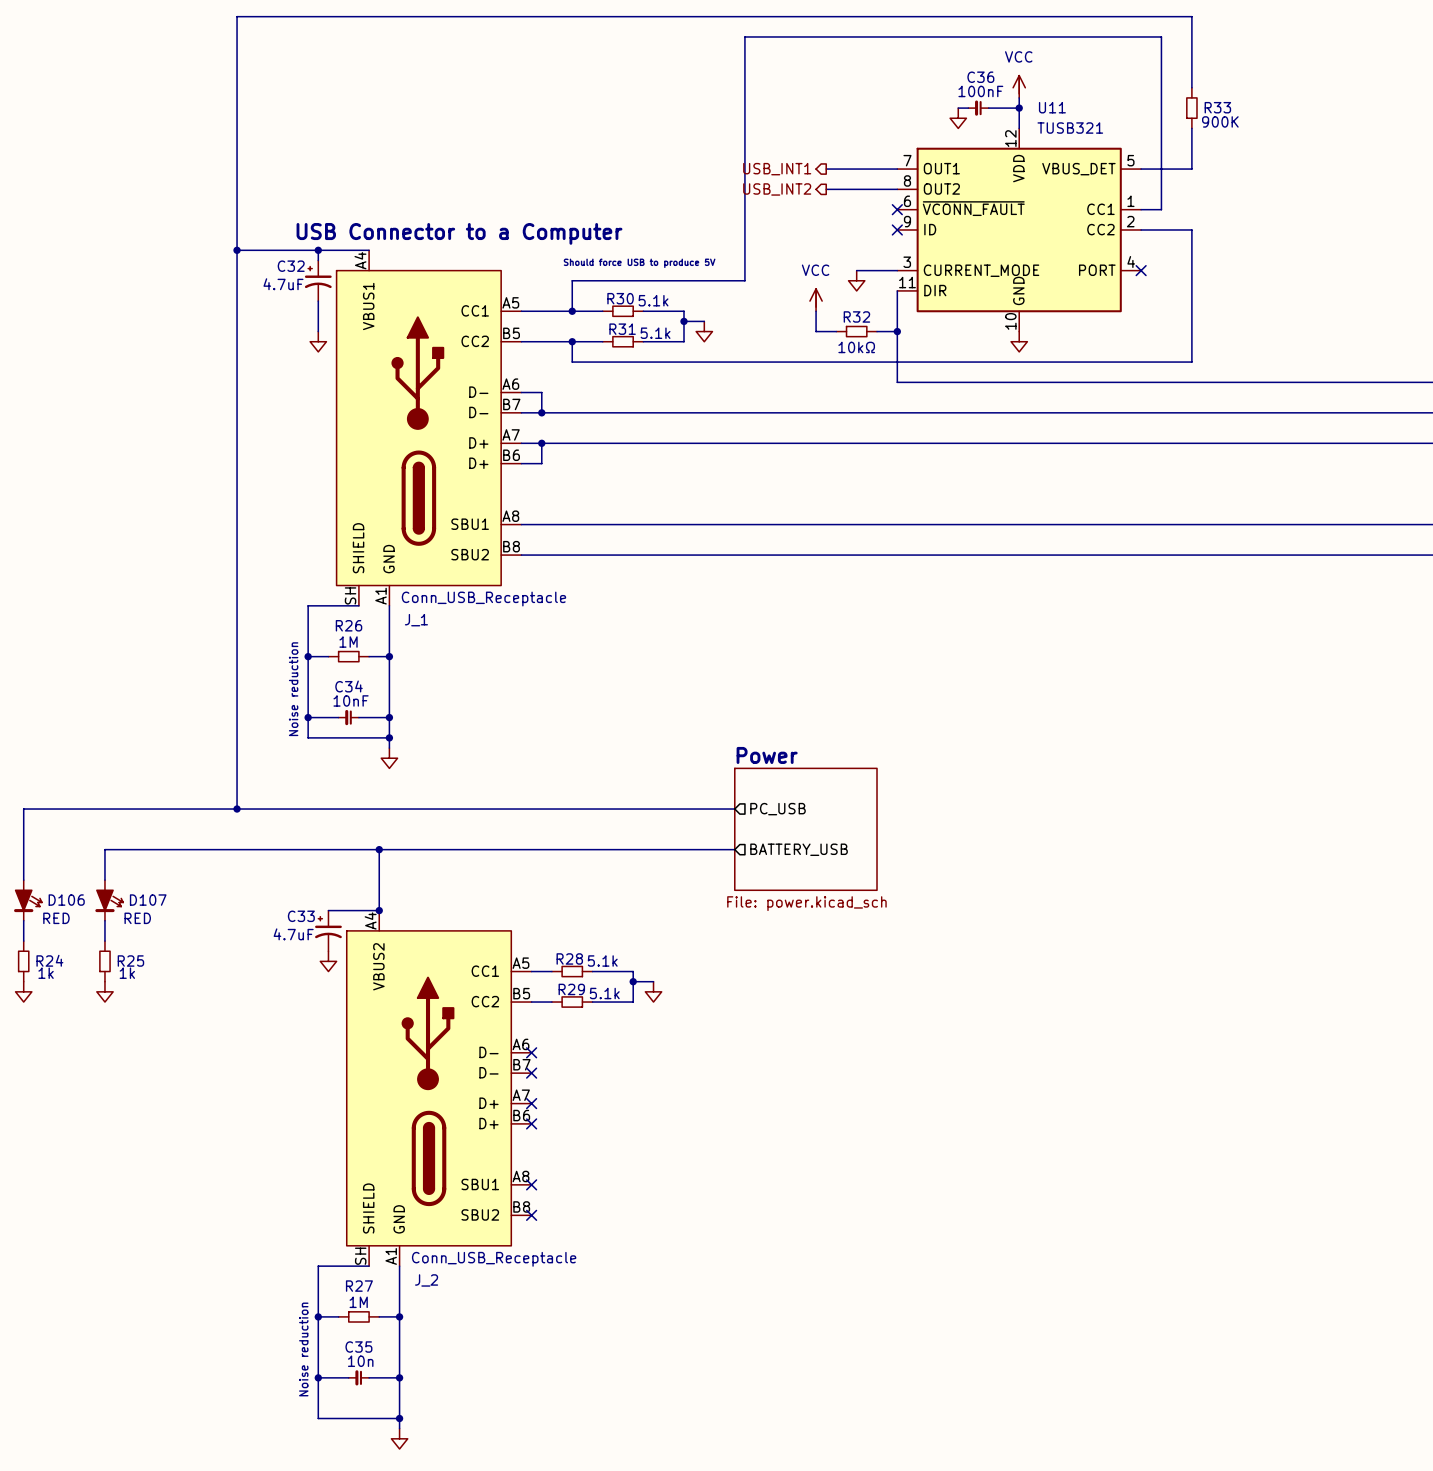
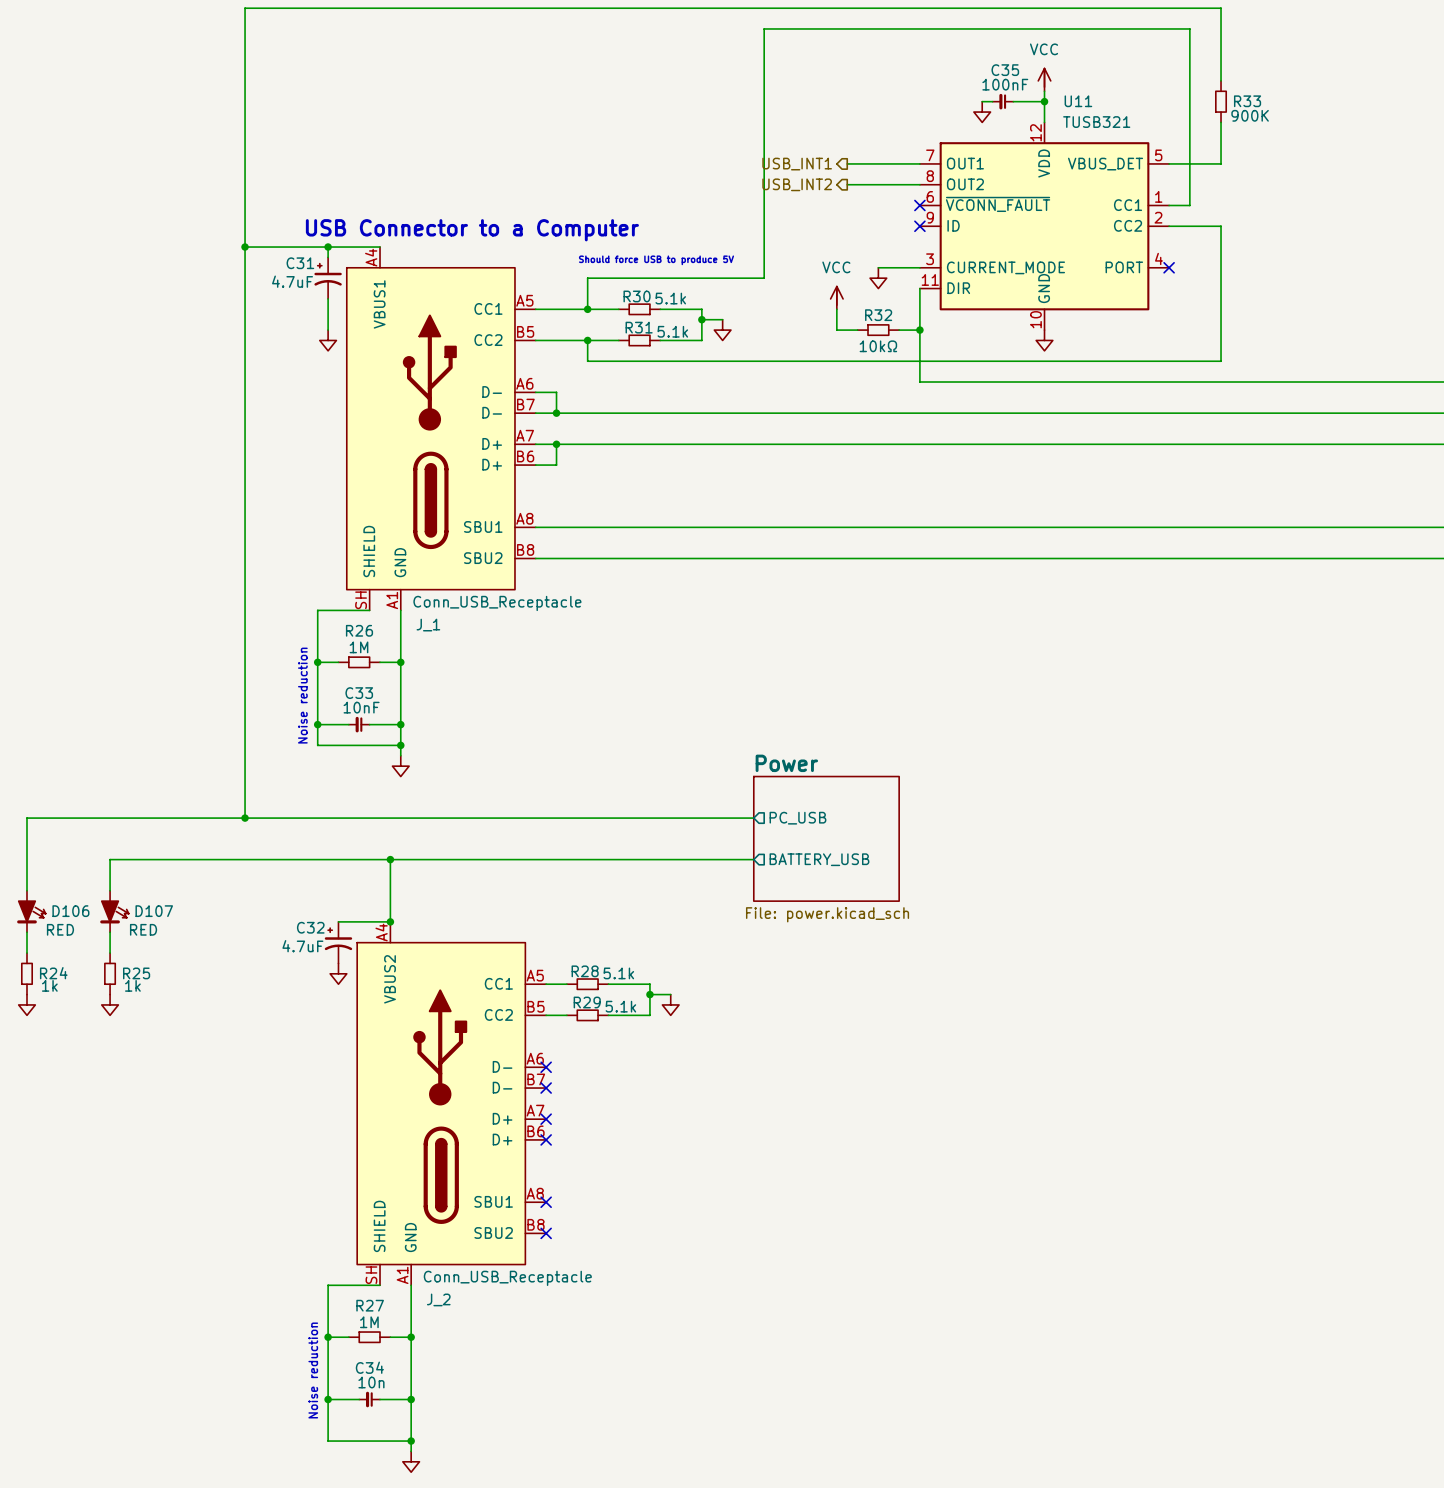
C36 name: C36 (980, 77) -> C35 (1005, 70)
C32 name: C32 (291, 266) -> C31 (300, 263)
C34 name: C34 (349, 686) -> C33 (359, 693)
C33 name: C33 (301, 916) -> C32 (310, 927)
C35 name: C35 (358, 1347) -> C34 (369, 1367)

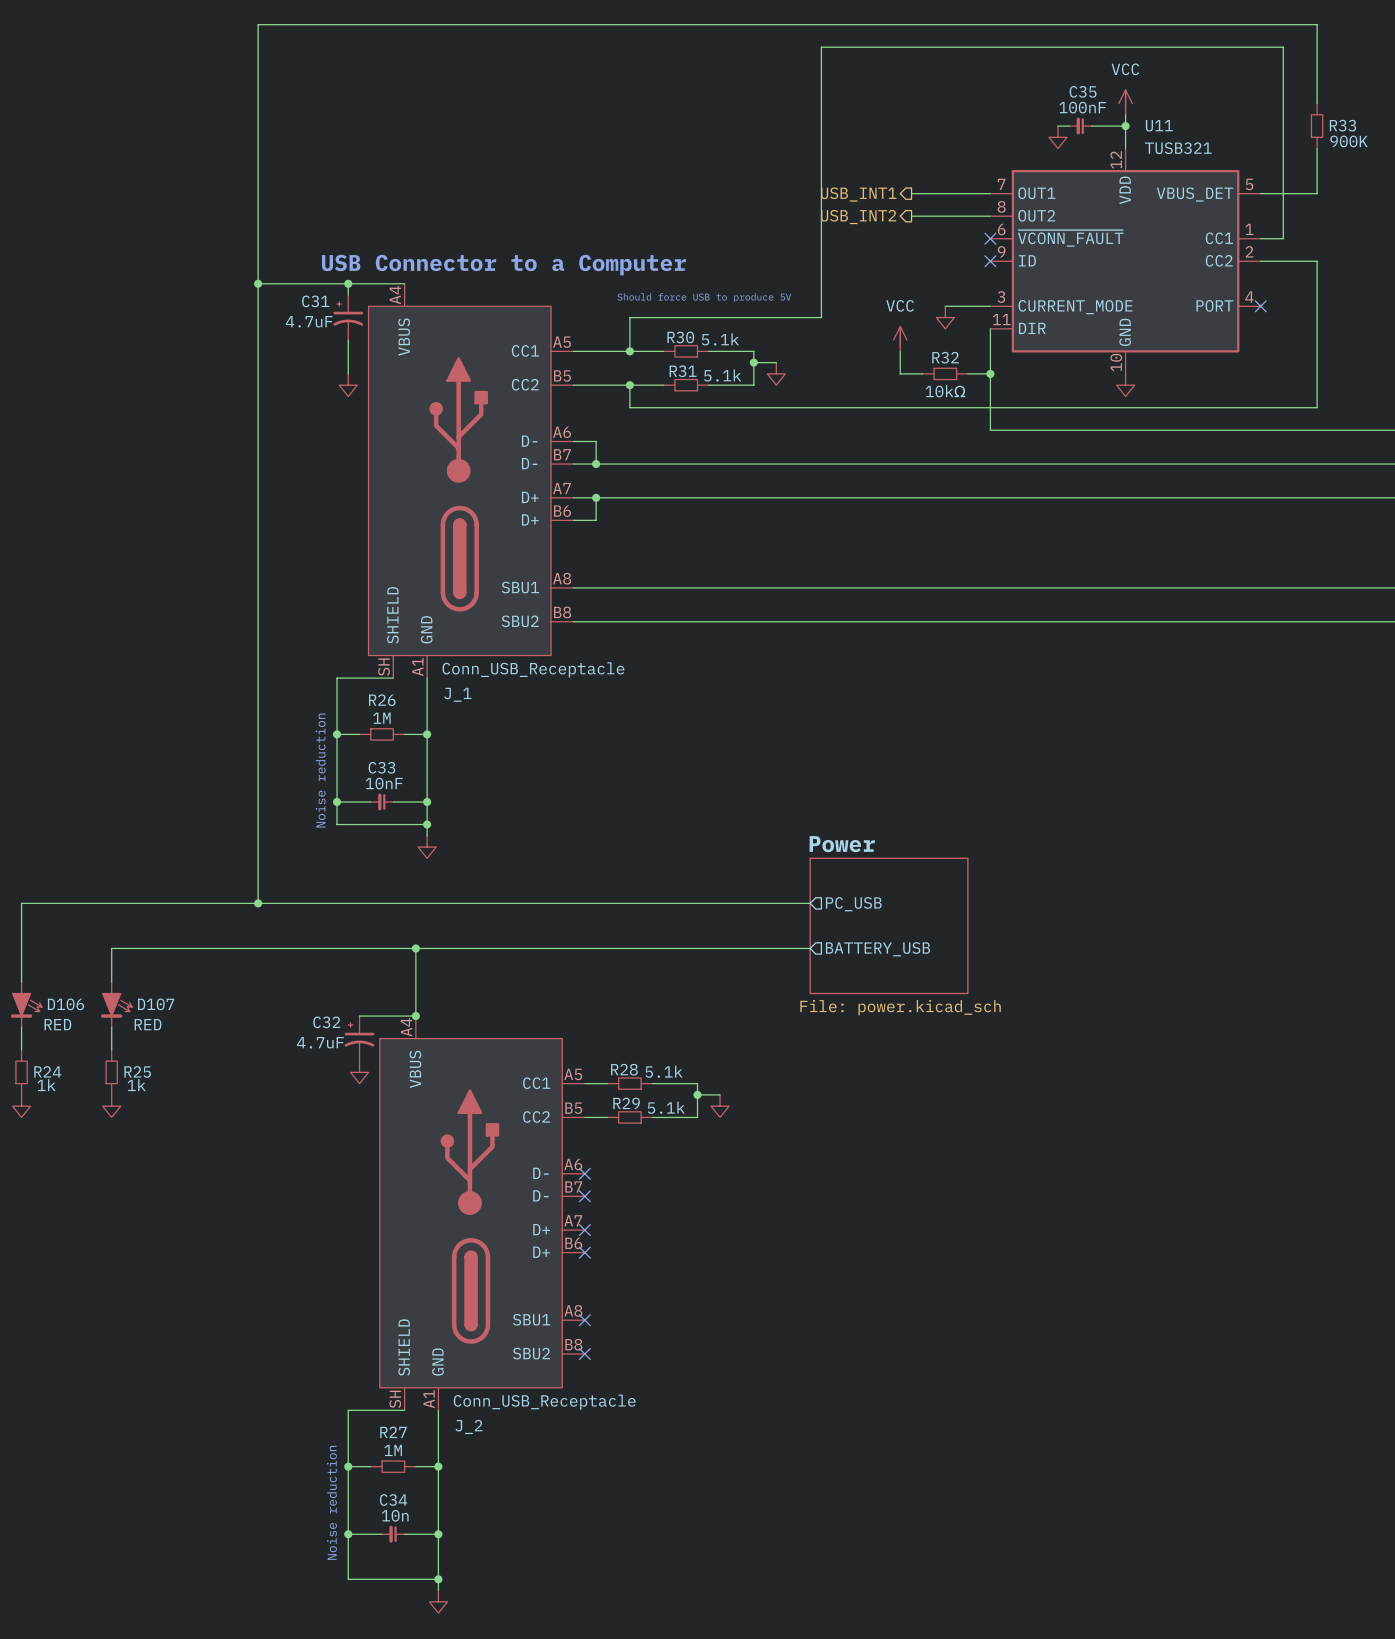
J_1 pin name: VBUS1 (379, 304) -> VBUS (404, 337)
J_2 pin name: VBUS2 (390, 979) -> VBUS (415, 1069)

